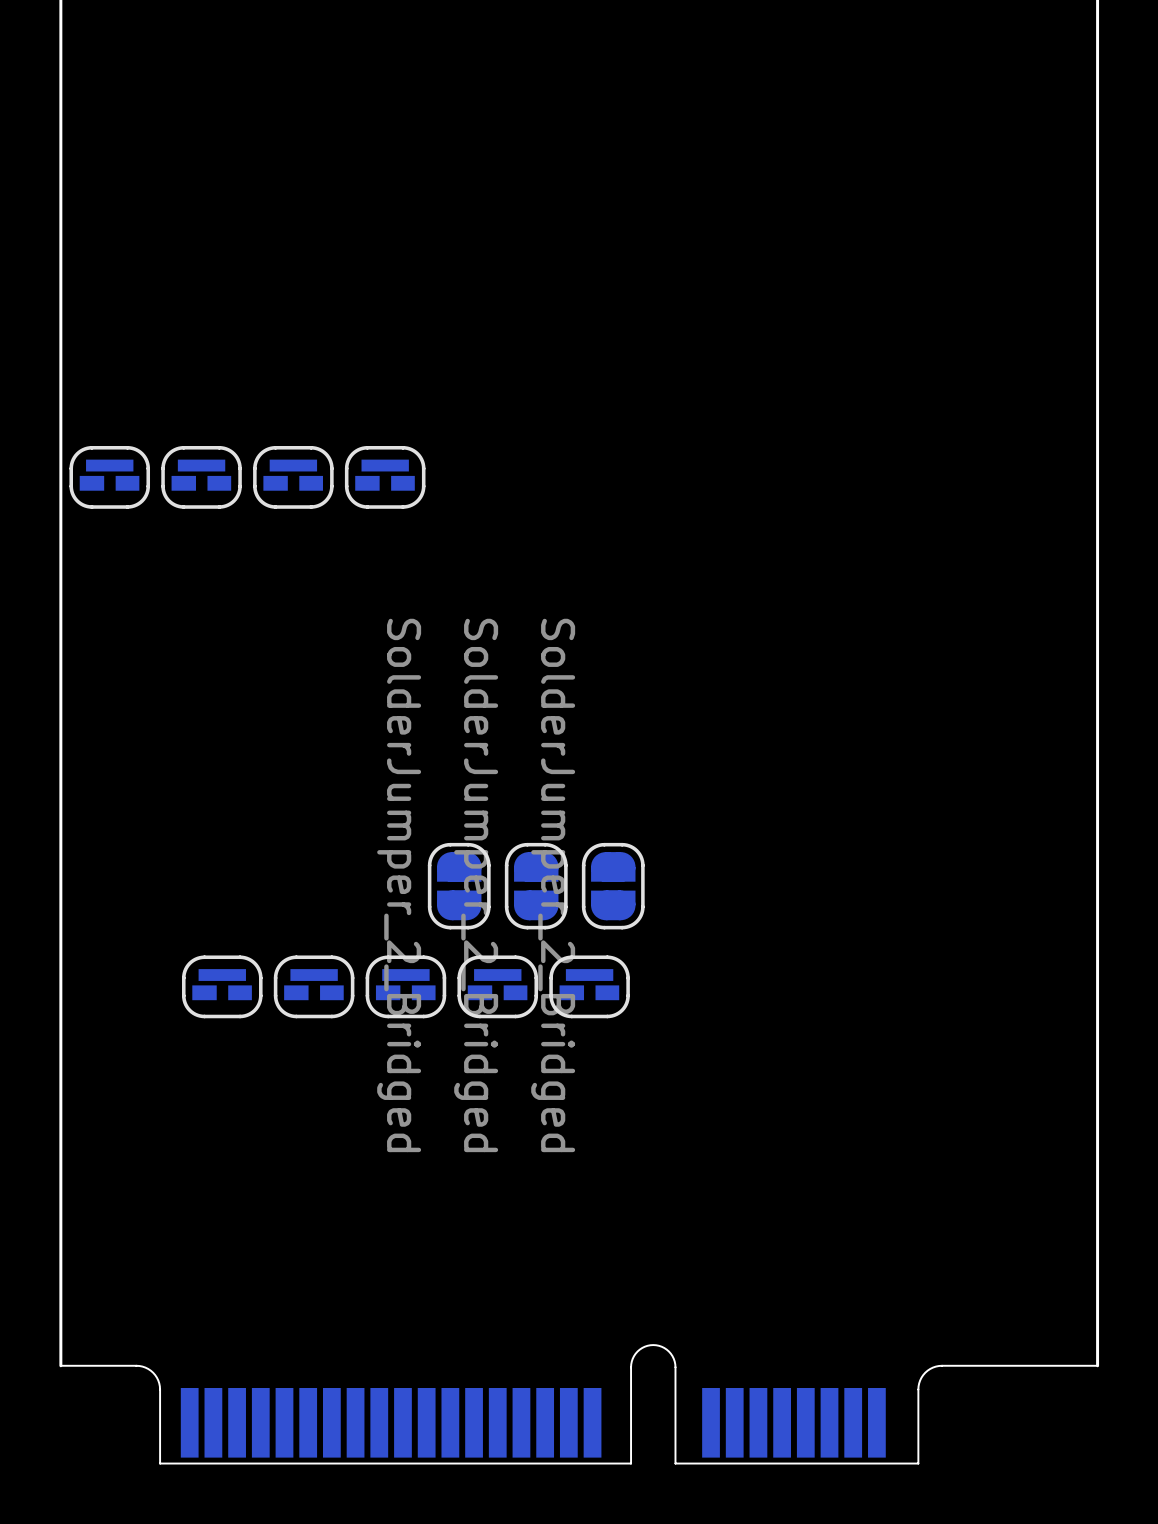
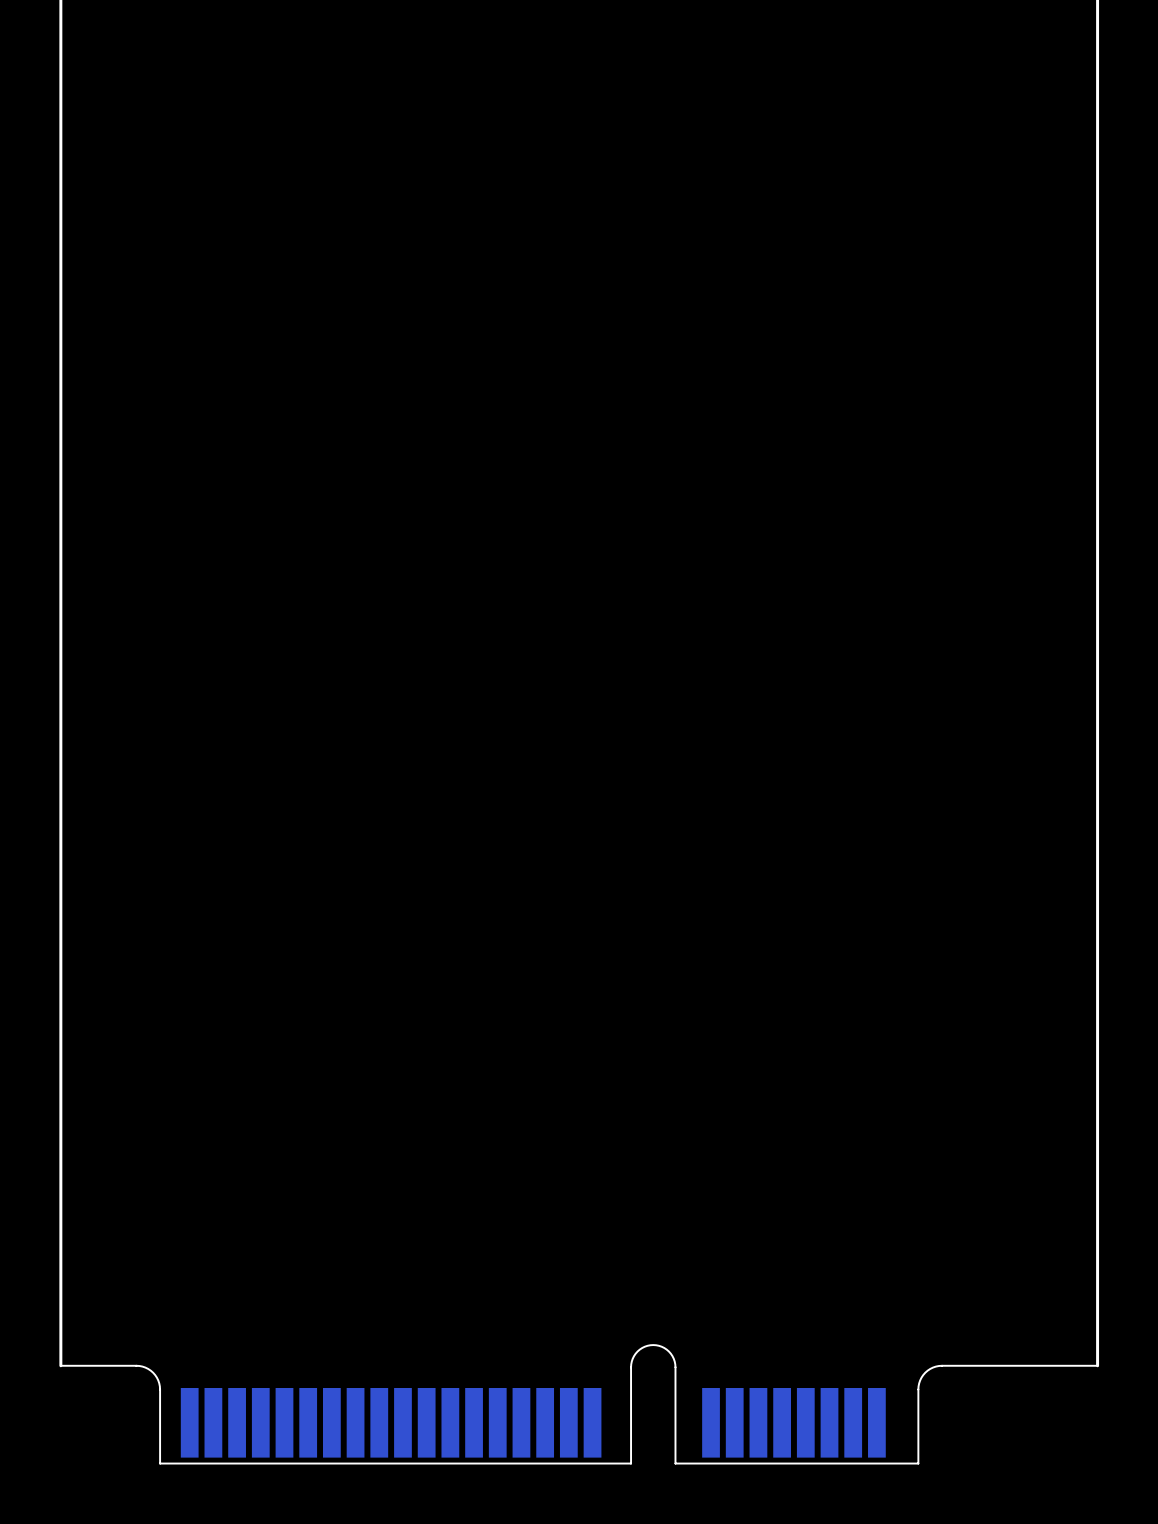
part: (109, 477) -> none
part: (201, 477) -> none
part: (293, 477) -> none
part: (385, 477) -> none
part: SolderJumper_2_Bridged (459, 886) -> none
part: SolderJumper_2_Bridged (536, 886) -> none
part: SolderJumper_2_Bridged (613, 886) -> none
part: (222, 986) -> none
part: (314, 986) -> none
part: (405, 986) -> none
part: (497, 986) -> none
part: (589, 986) -> none

